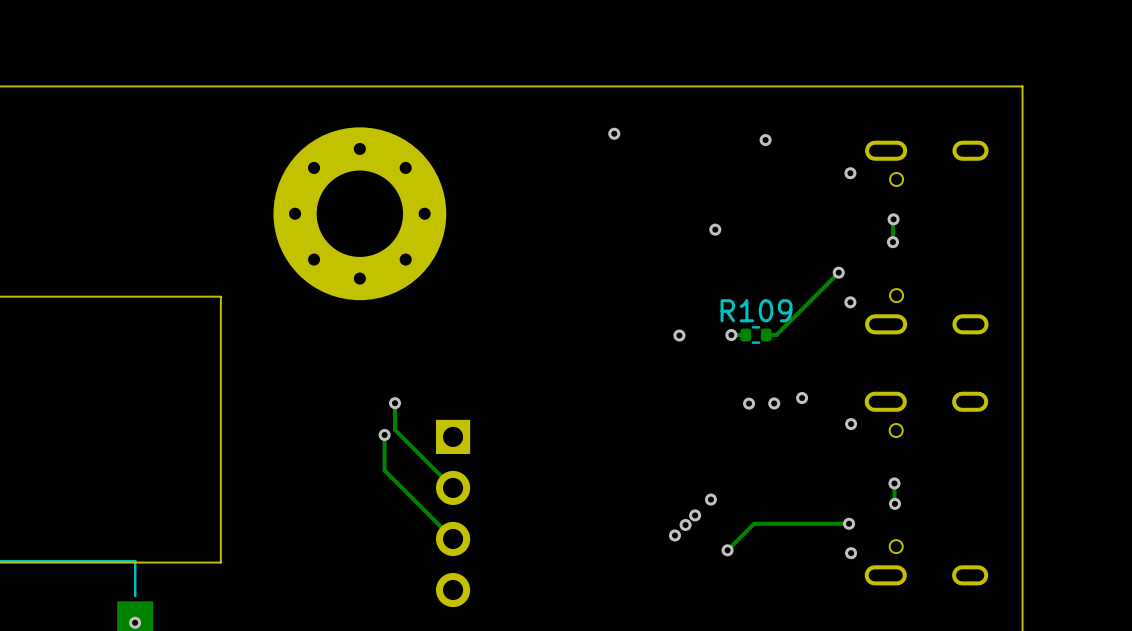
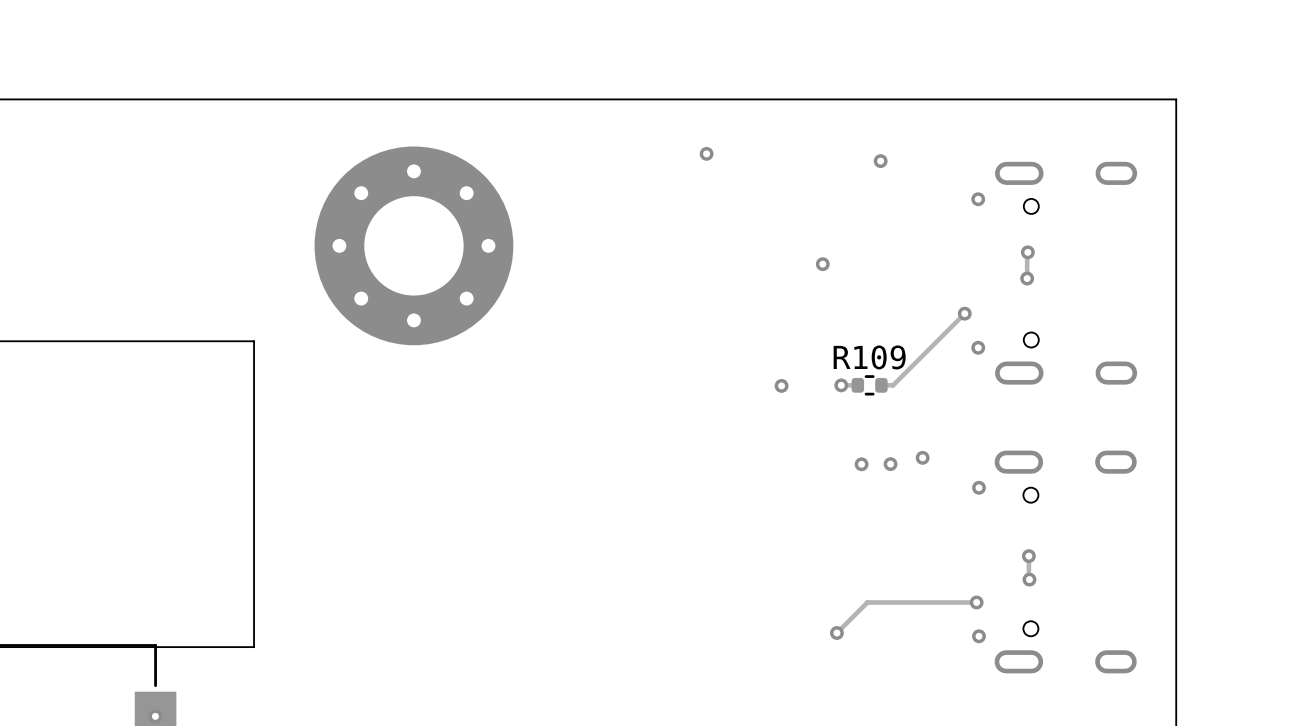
track: (395, 403) (395, 429) (453, 487) -> none
via: (395, 403) -> none
track: (384, 434) (384, 470) (453, 538) -> none
via: (384, 434) -> none
via: (710, 499) -> none
part: (453, 513) -> none
via: (695, 515) -> none
via: (685, 524) -> none
via: (674, 535) -> none

